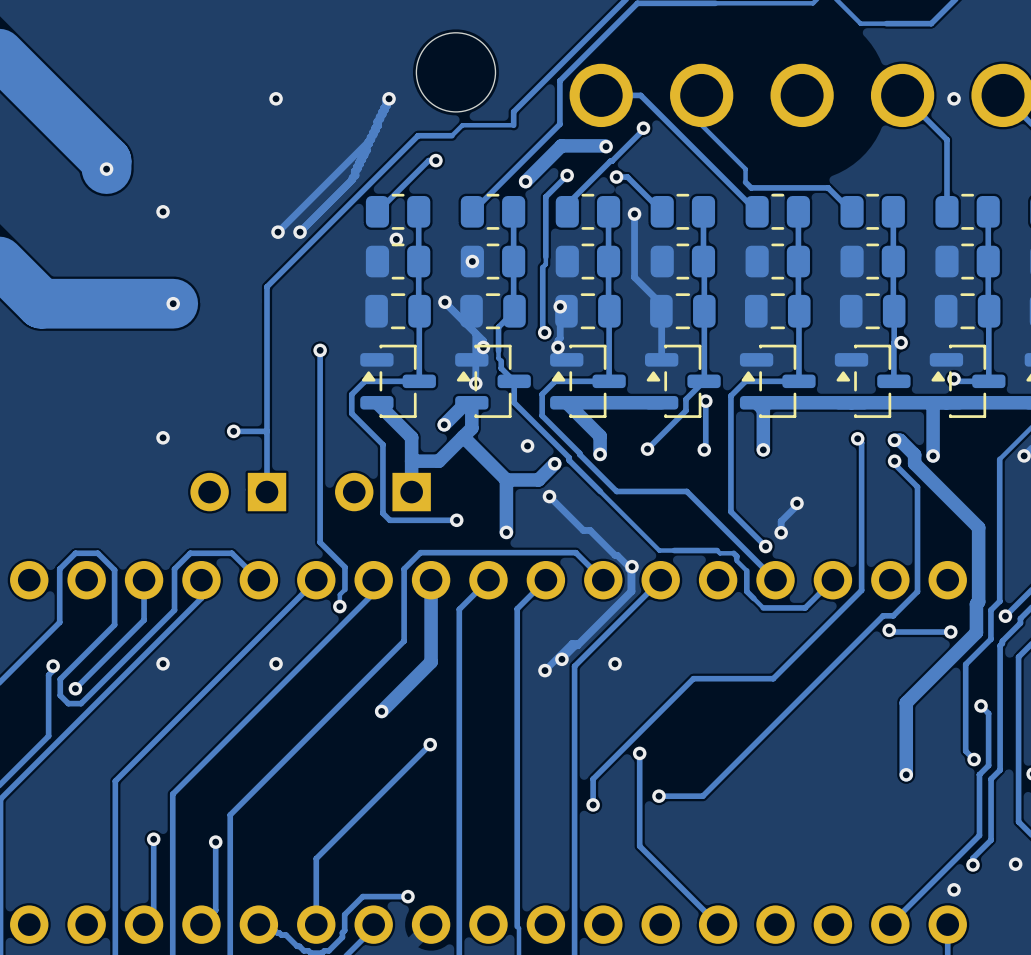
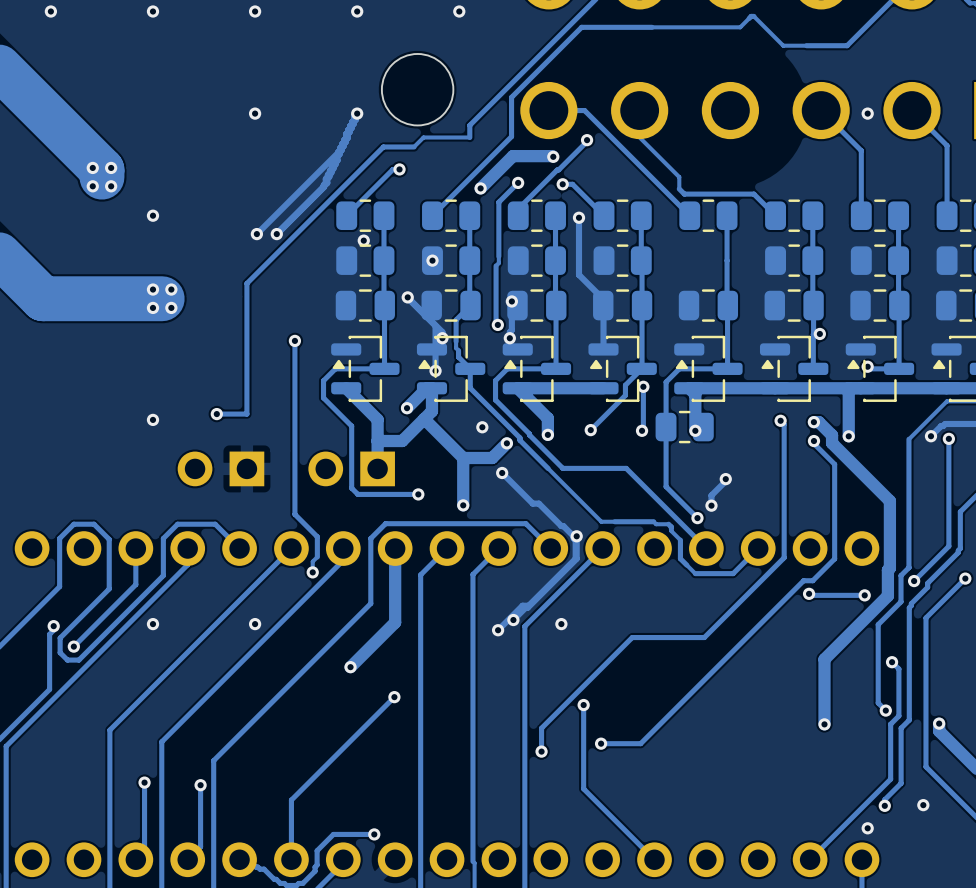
via: none -> (92, 167)
via: none -> (111, 167)
via: (106, 169) -> none
via: none -> (92, 186)
via: none -> (111, 186)
part position: (777, 261) -> (684, 427)
via: none -> (152, 289)
via: none -> (171, 289)
via: (173, 303) -> none
via: none -> (152, 307)
via: none -> (171, 307)
track: (267, 431) (267, 492) -> none

